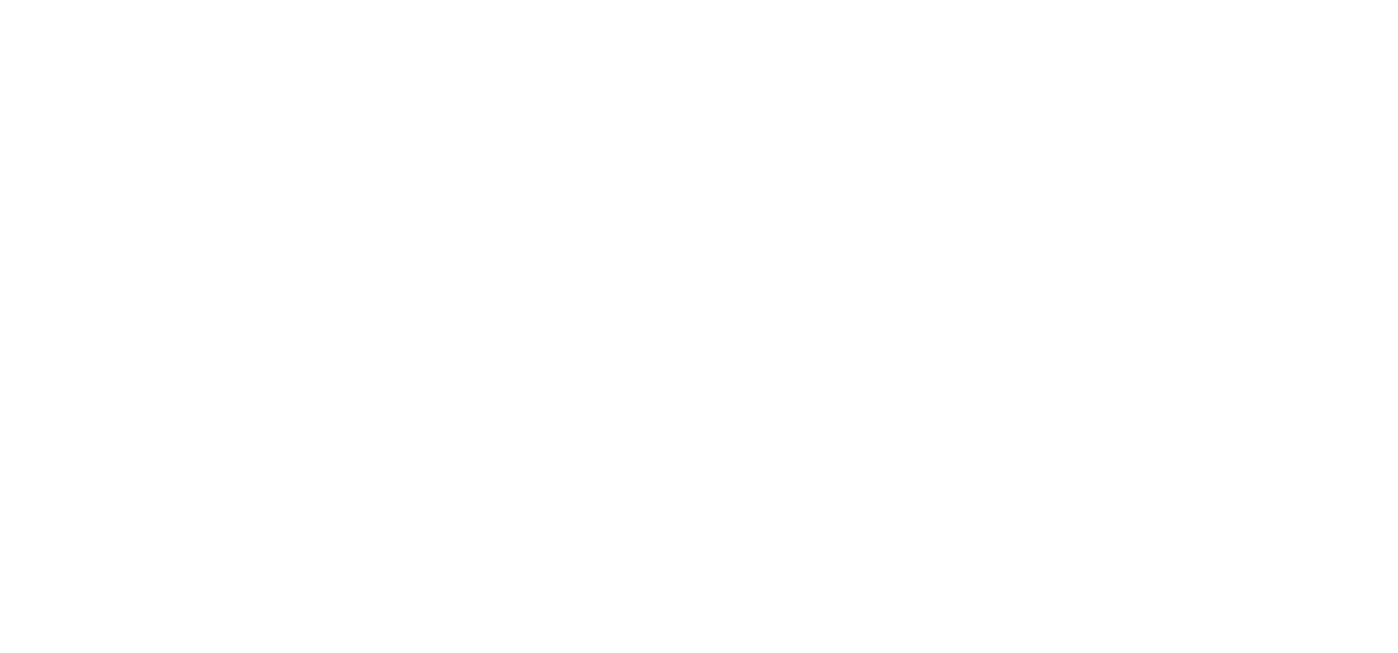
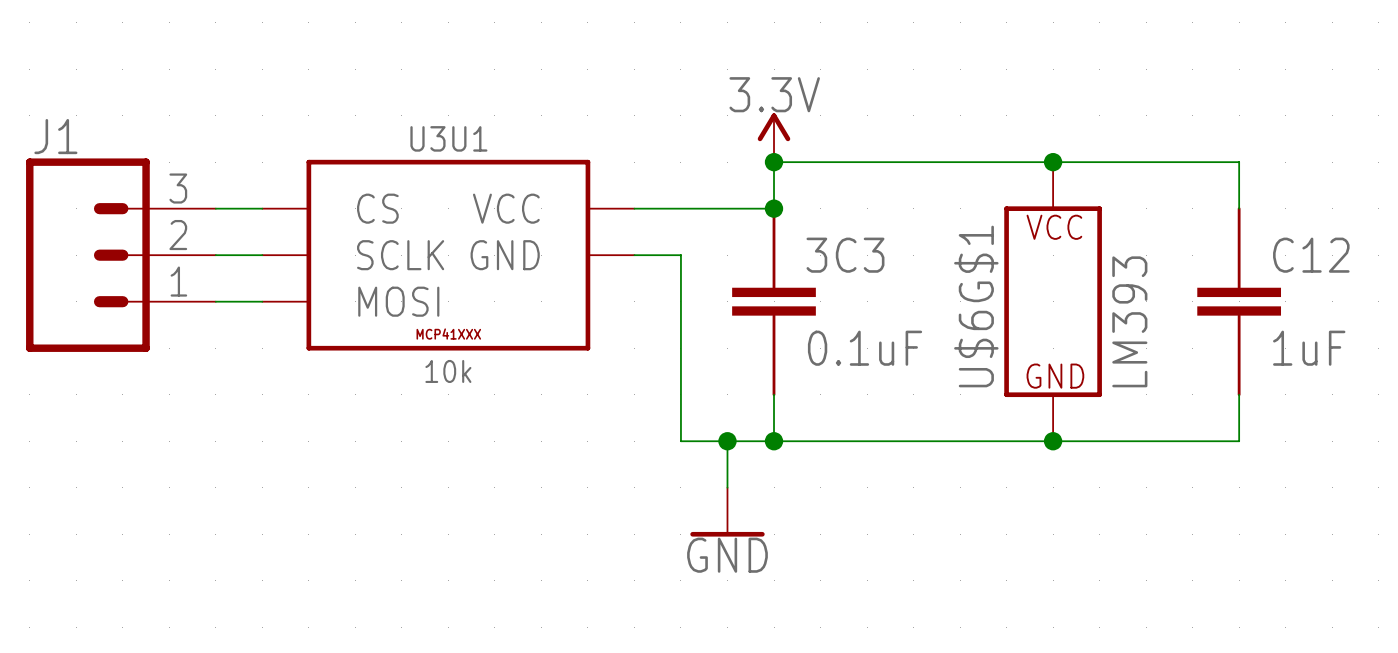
power symbol: none -> 3.3V (774, 137)
junction: none -> (774, 162)
junction: none -> (1053, 162)
wire: none -> (215, 208) (262, 208)
wire: none -> (634, 208) (774, 208) (774, 162) (1239, 162) (1239, 208)
junction: none -> (774, 208)
J1: none -> (120, 255)
wire: none -> (215, 255) (262, 255)
U3U1: none -> 10k (448, 255)
wire: none -> (634, 255) (680, 255) (680, 441) (1239, 441) (1239, 394)
wire: none -> (215, 301) (262, 301)
3C3: none -> 0.1uF (774, 301)
U$6G$1: none -> LM393 (1053, 301)
C12: none -> 1uF (1239, 301)
wire: none -> (774, 394) (774, 441)
wire: none -> (727, 441) (727, 487)
junction: none -> (727, 441)
junction: none -> (774, 441)
junction: none -> (1053, 441)
power symbol: none -> GND (727, 512)

